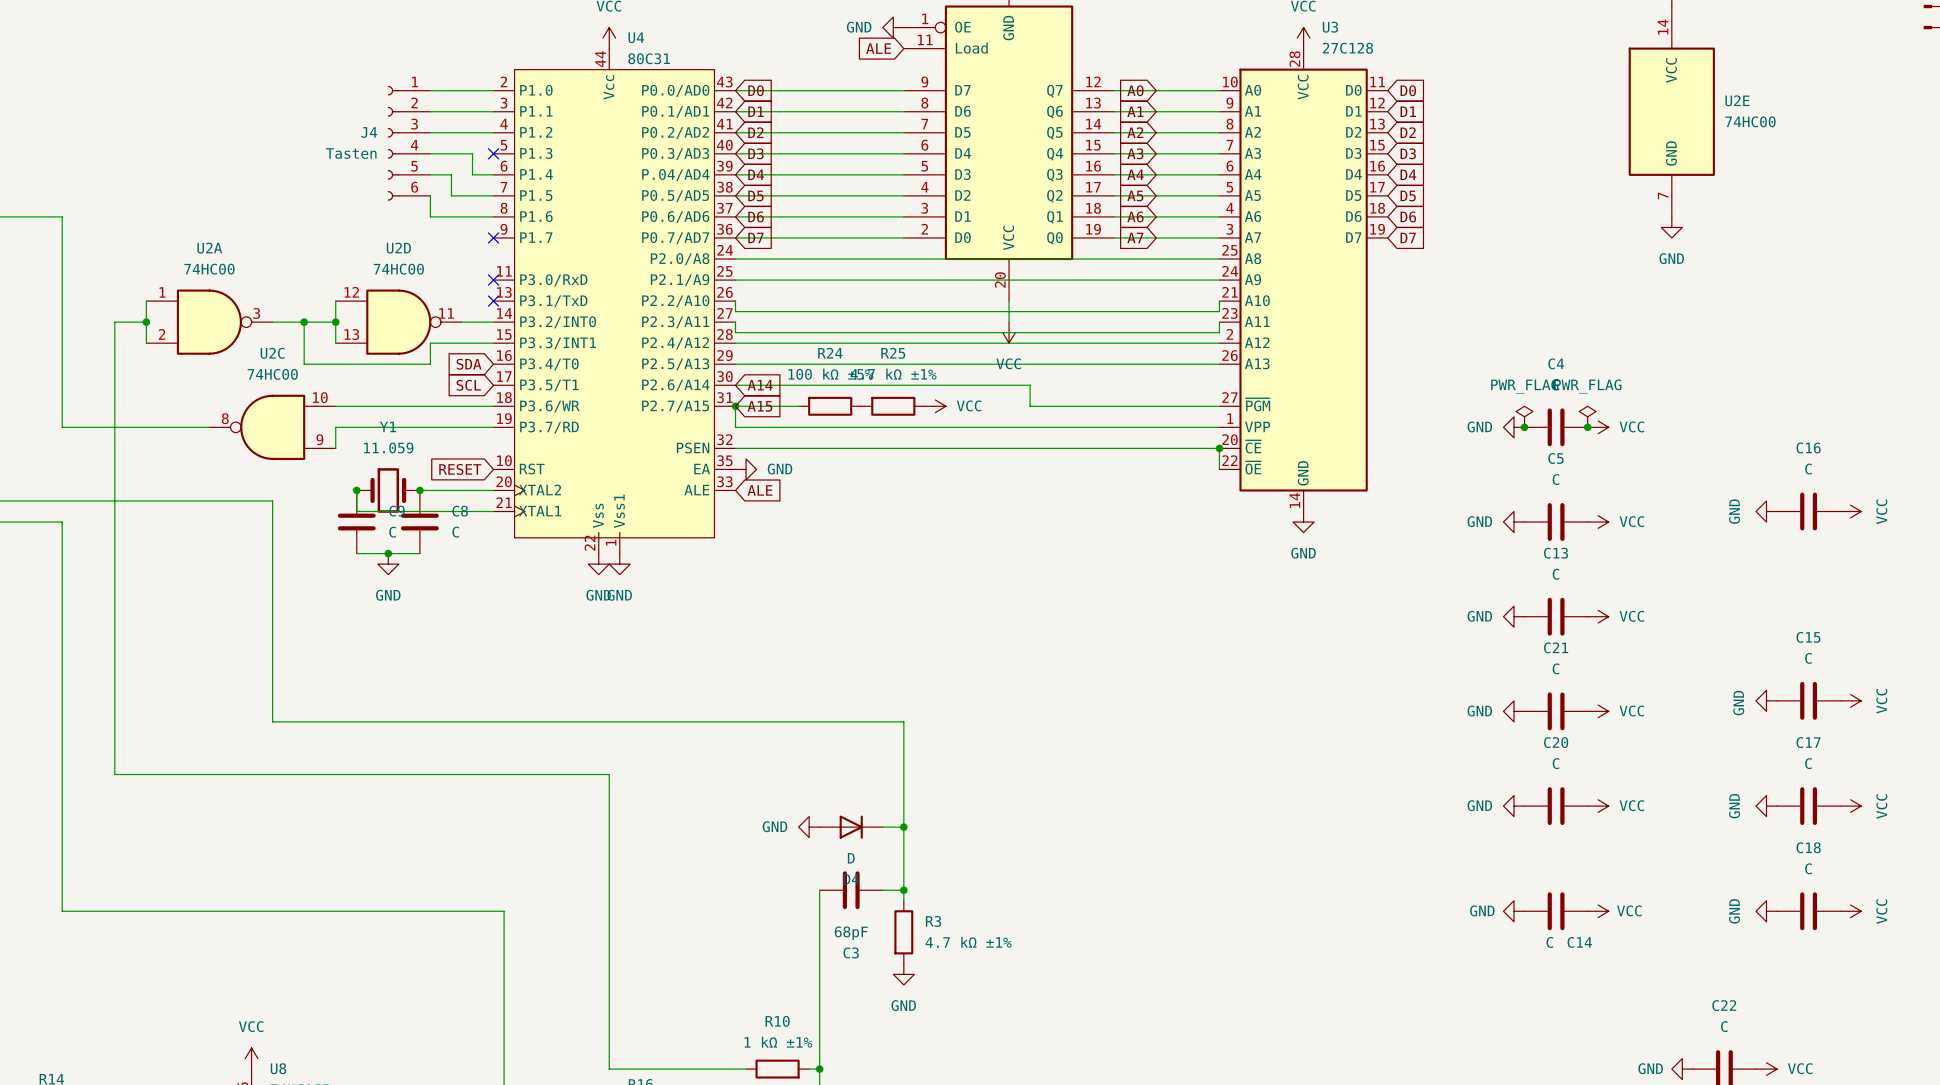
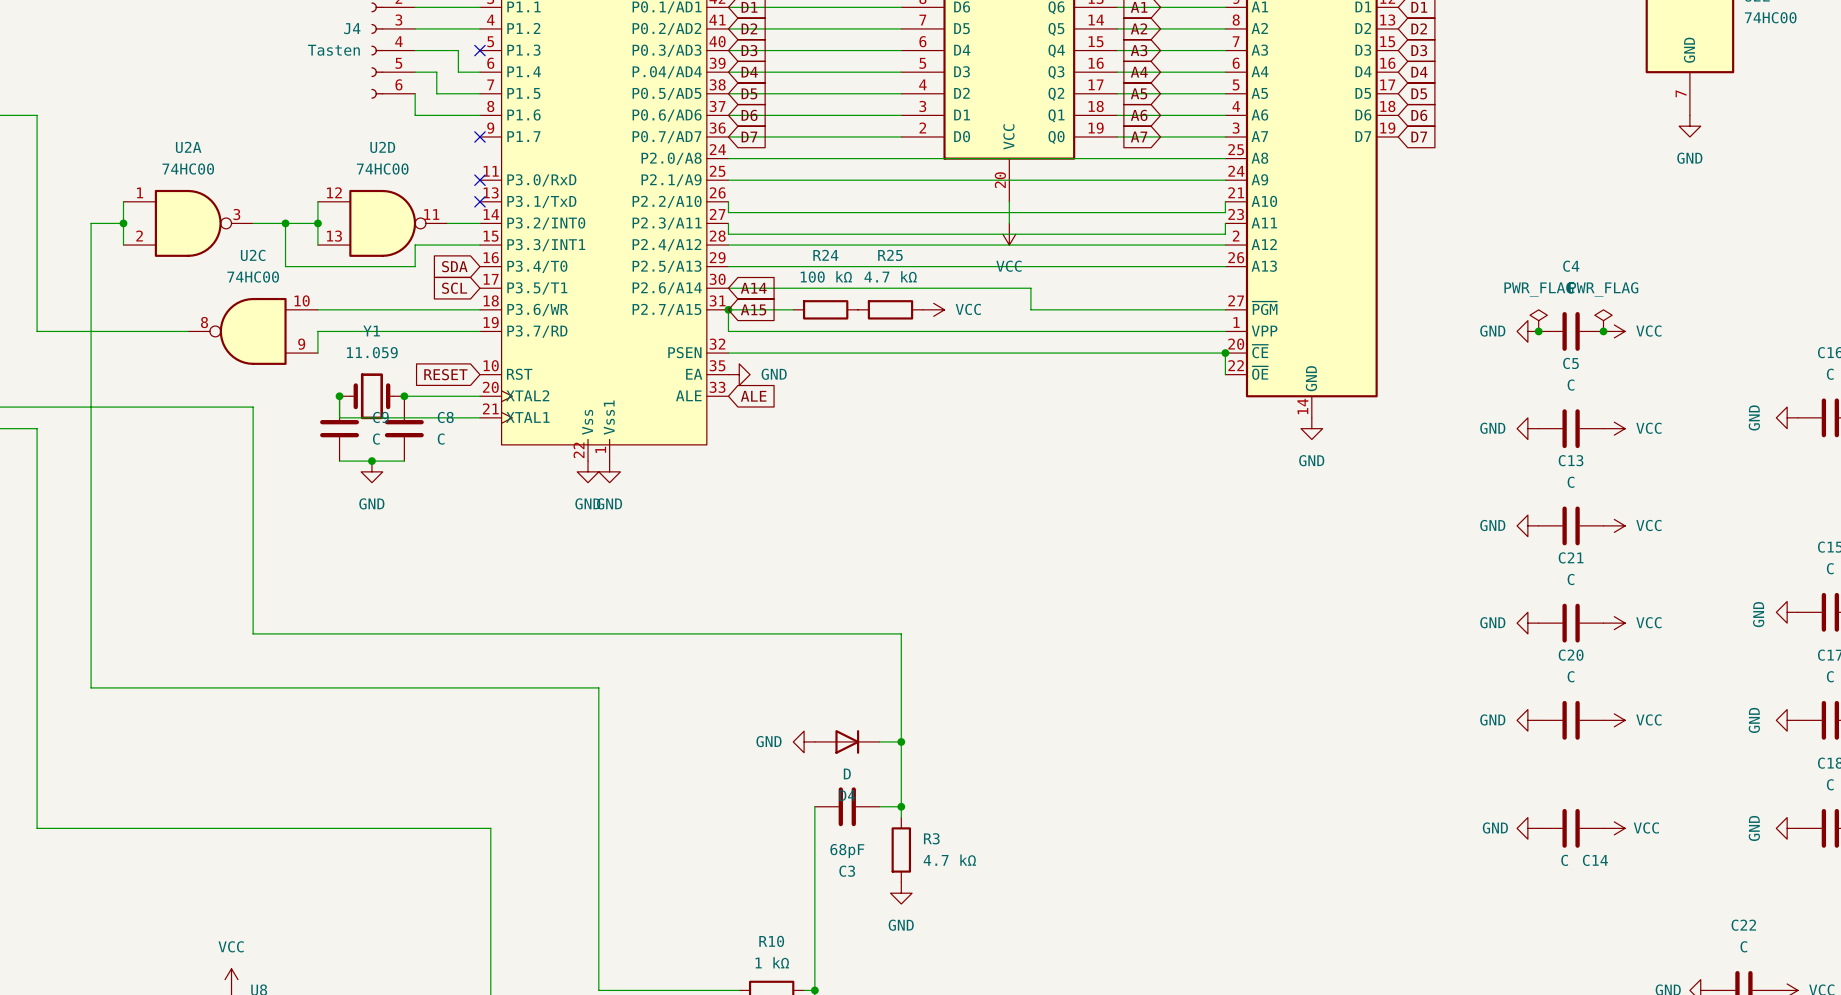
R24 value: 100 kΩ ±5% (830, 374) -> 100 kΩ (826, 276)
R25 value: 4.7 kΩ ±1% (893, 374) -> 4.7 kΩ (890, 276)
R3 value: 4.7 kΩ ±1% (968, 942) -> 4.7 kΩ (949, 860)
R10 value: 1 kΩ ±1% (778, 1042) -> 1 kΩ (772, 962)

